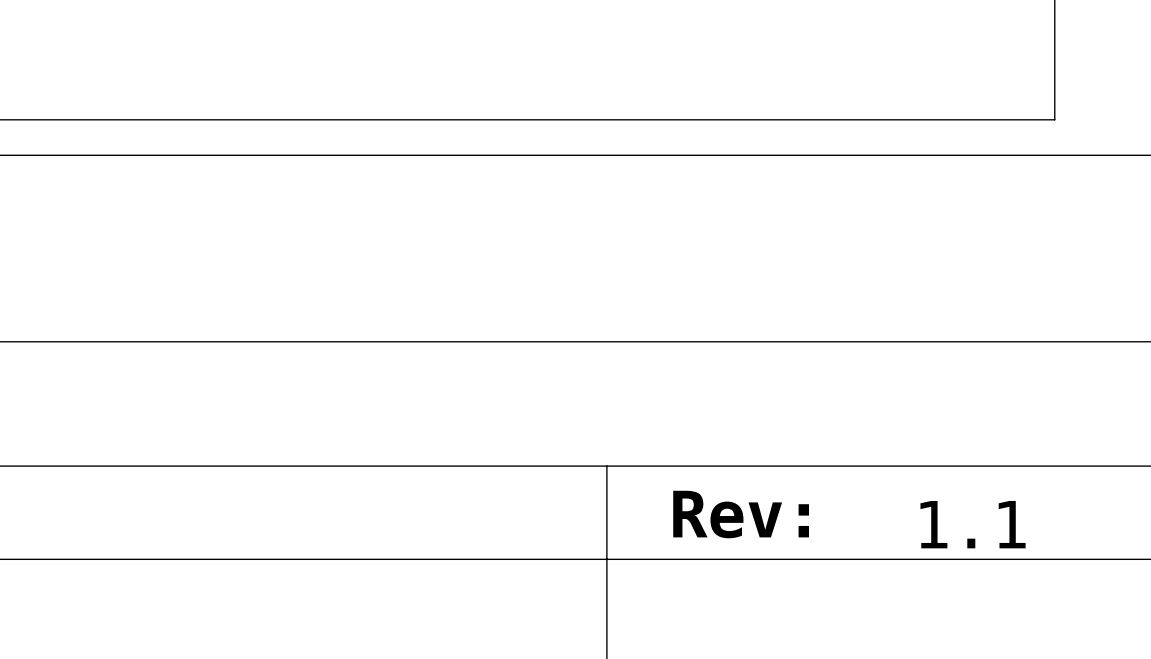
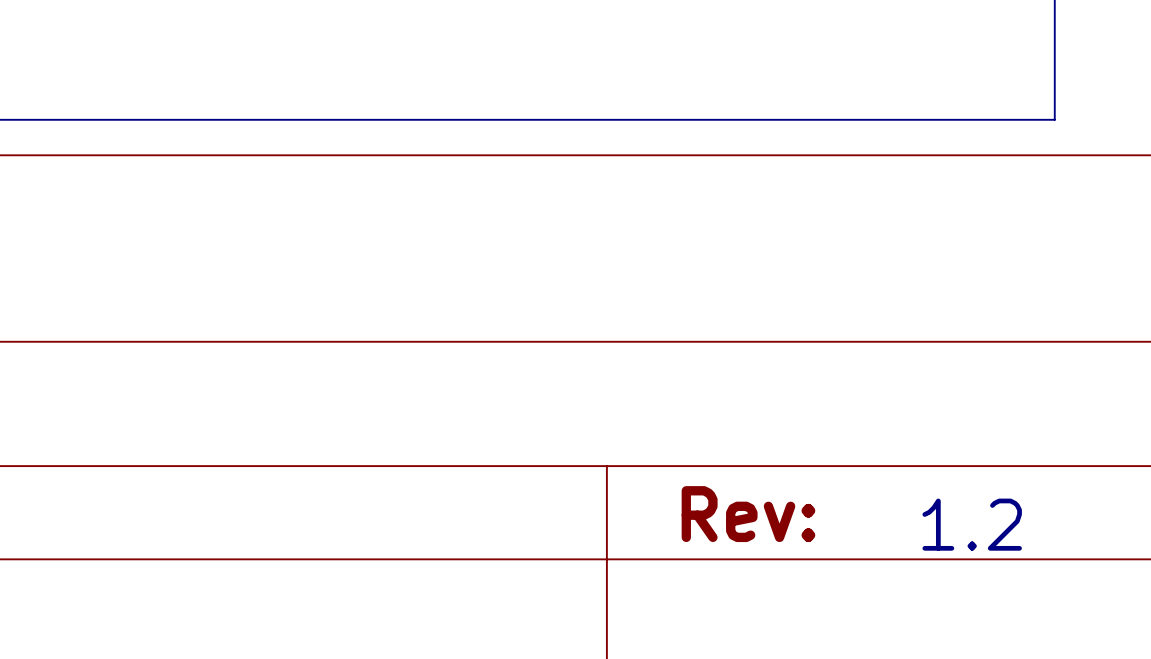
text: 1.1 (973, 524) -> 1.2 (972, 524)

